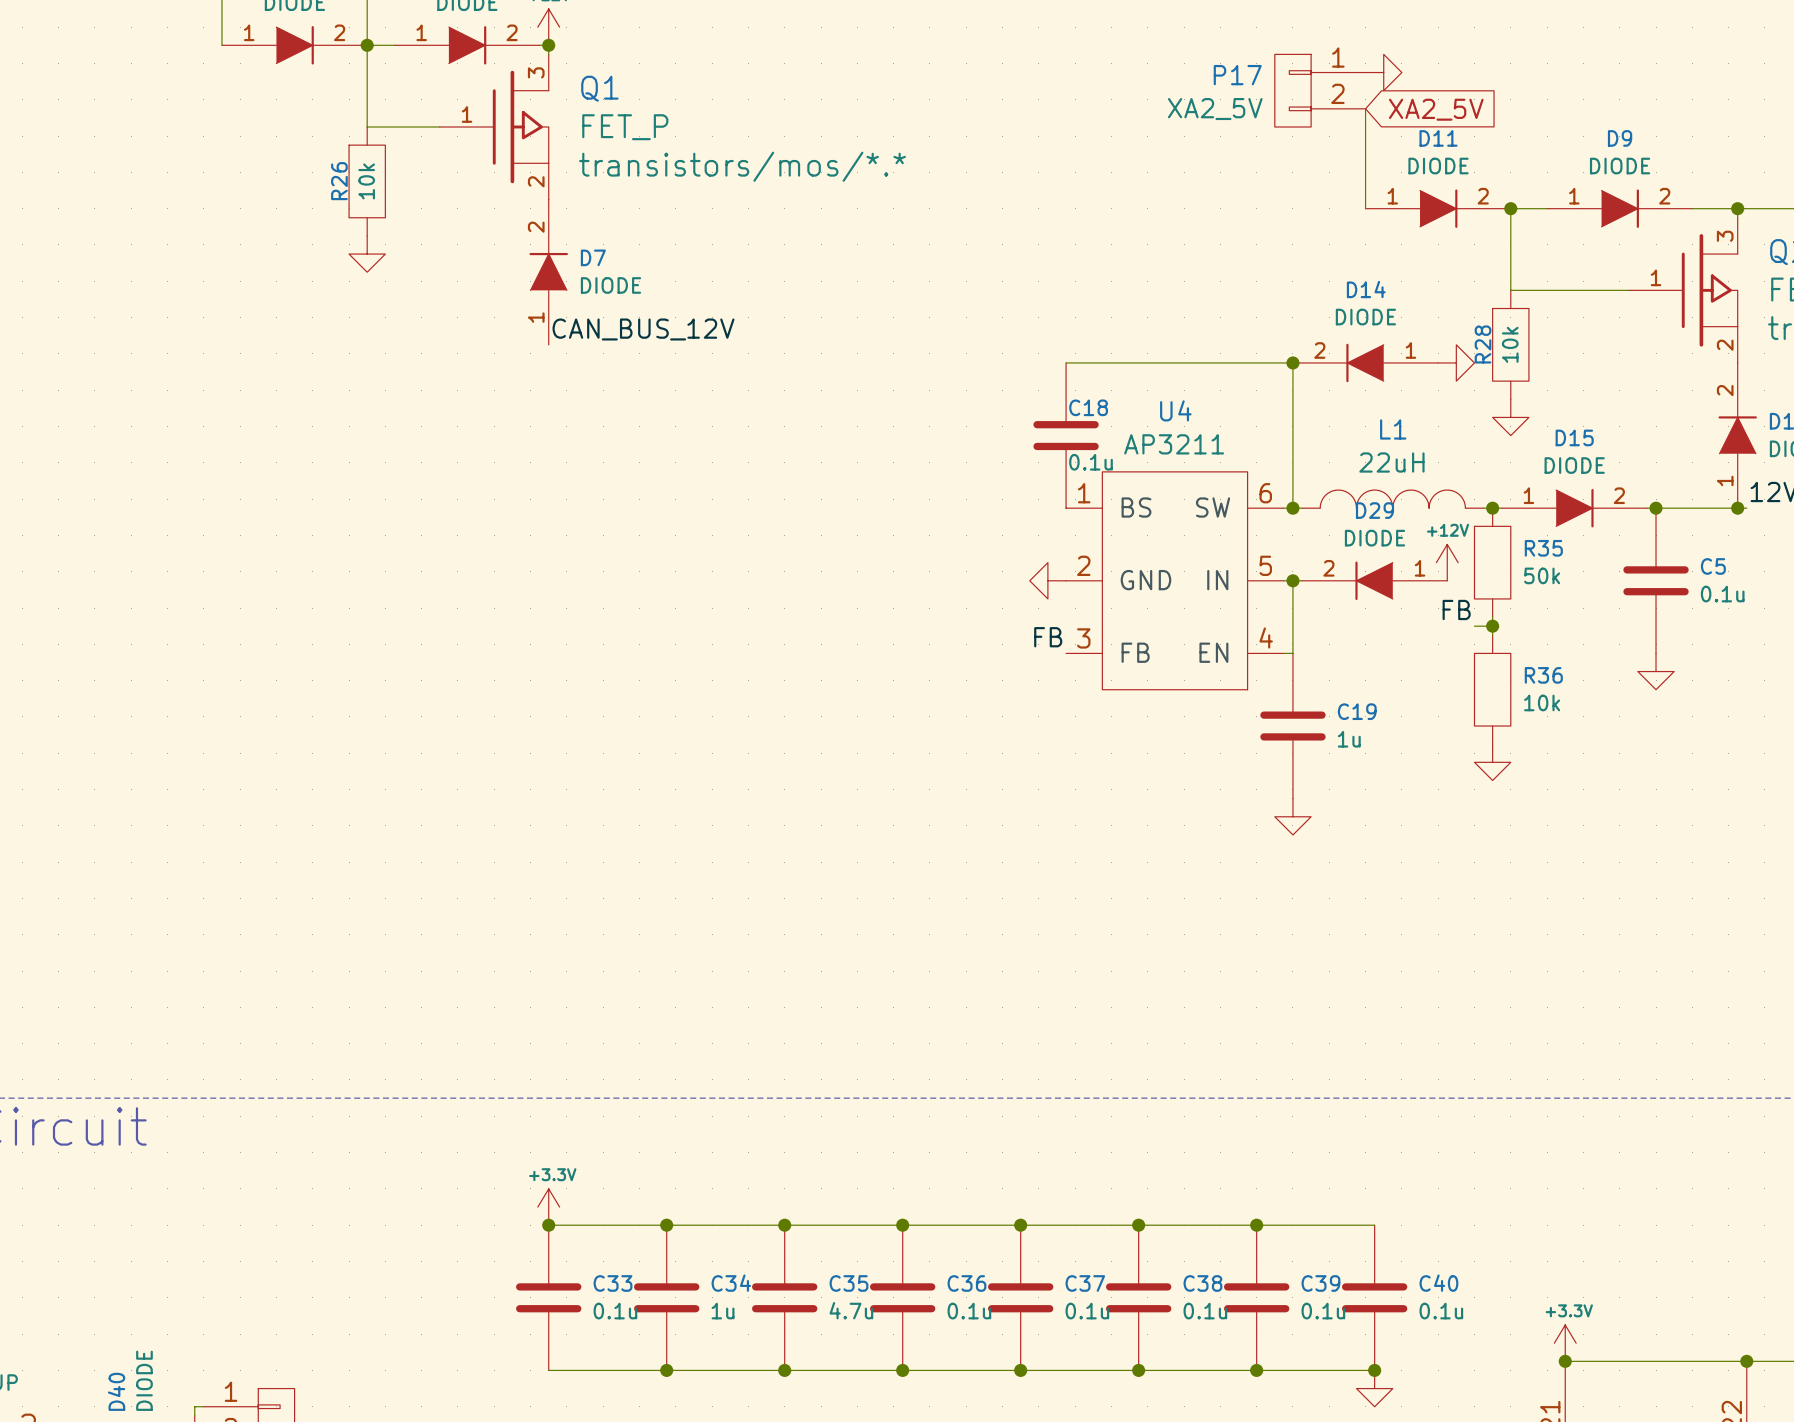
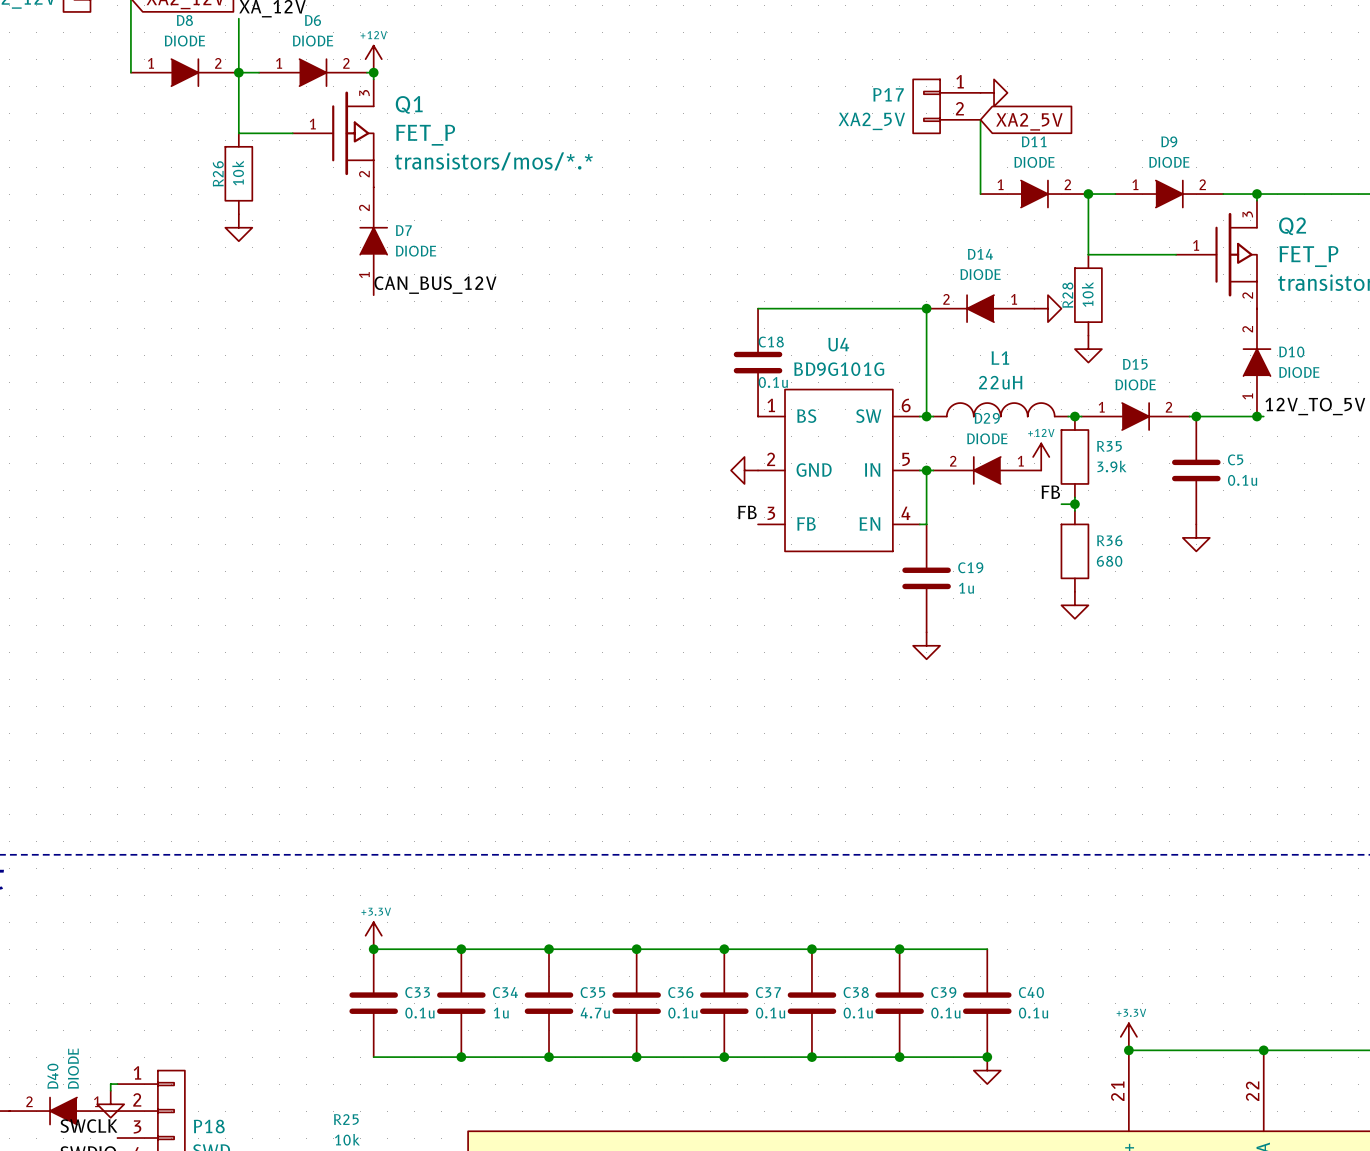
U4 value: AP3211 (1174, 444) -> BD9G101G (839, 369)
R35 value: 50k (1542, 575) -> 3.9k (1111, 466)
R36 value: 10k (1542, 702) -> 680 (1109, 561)

